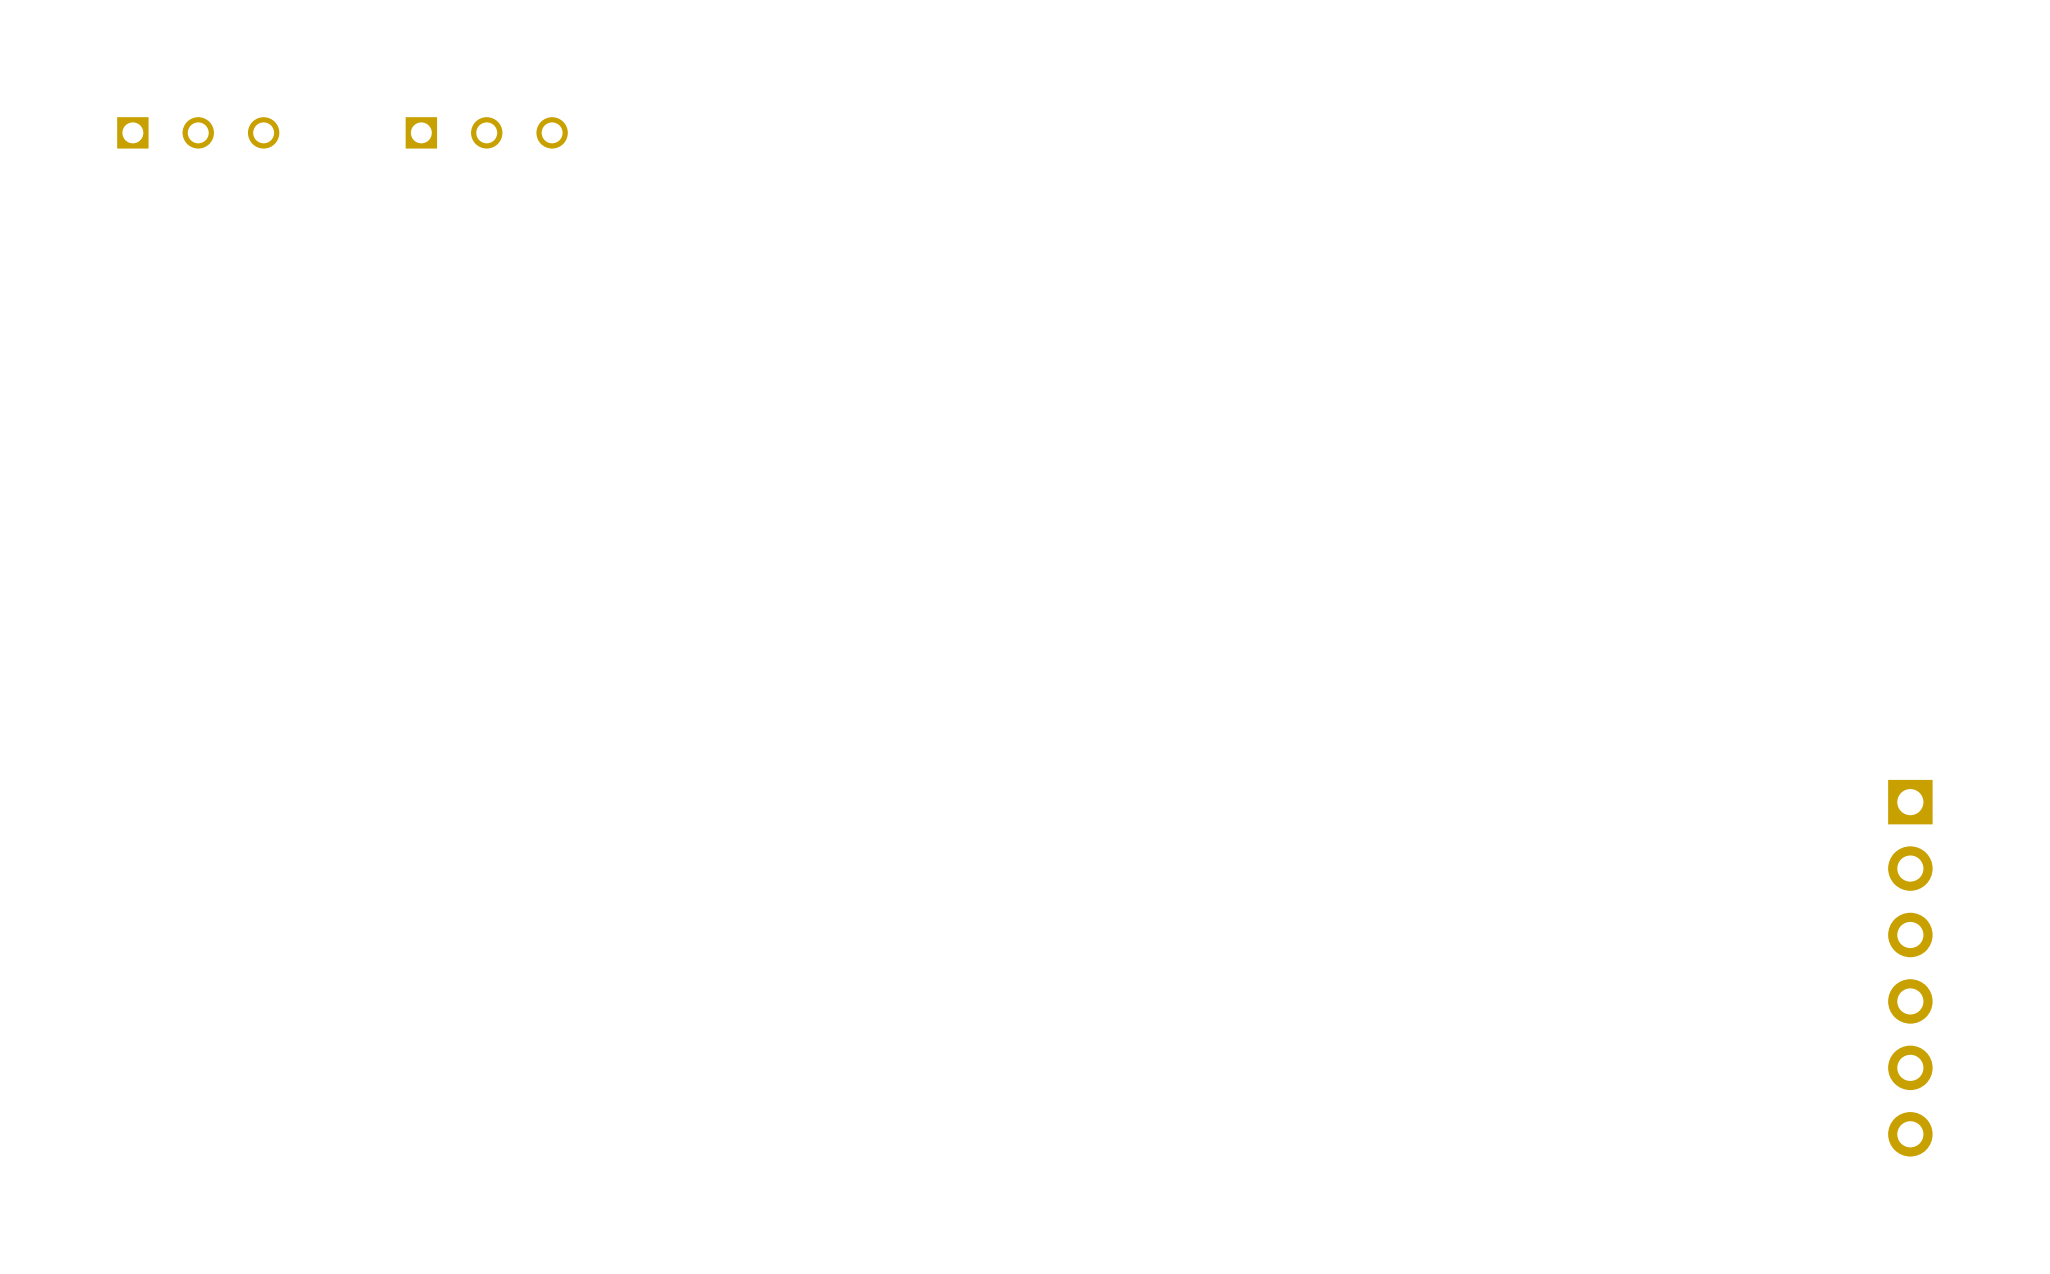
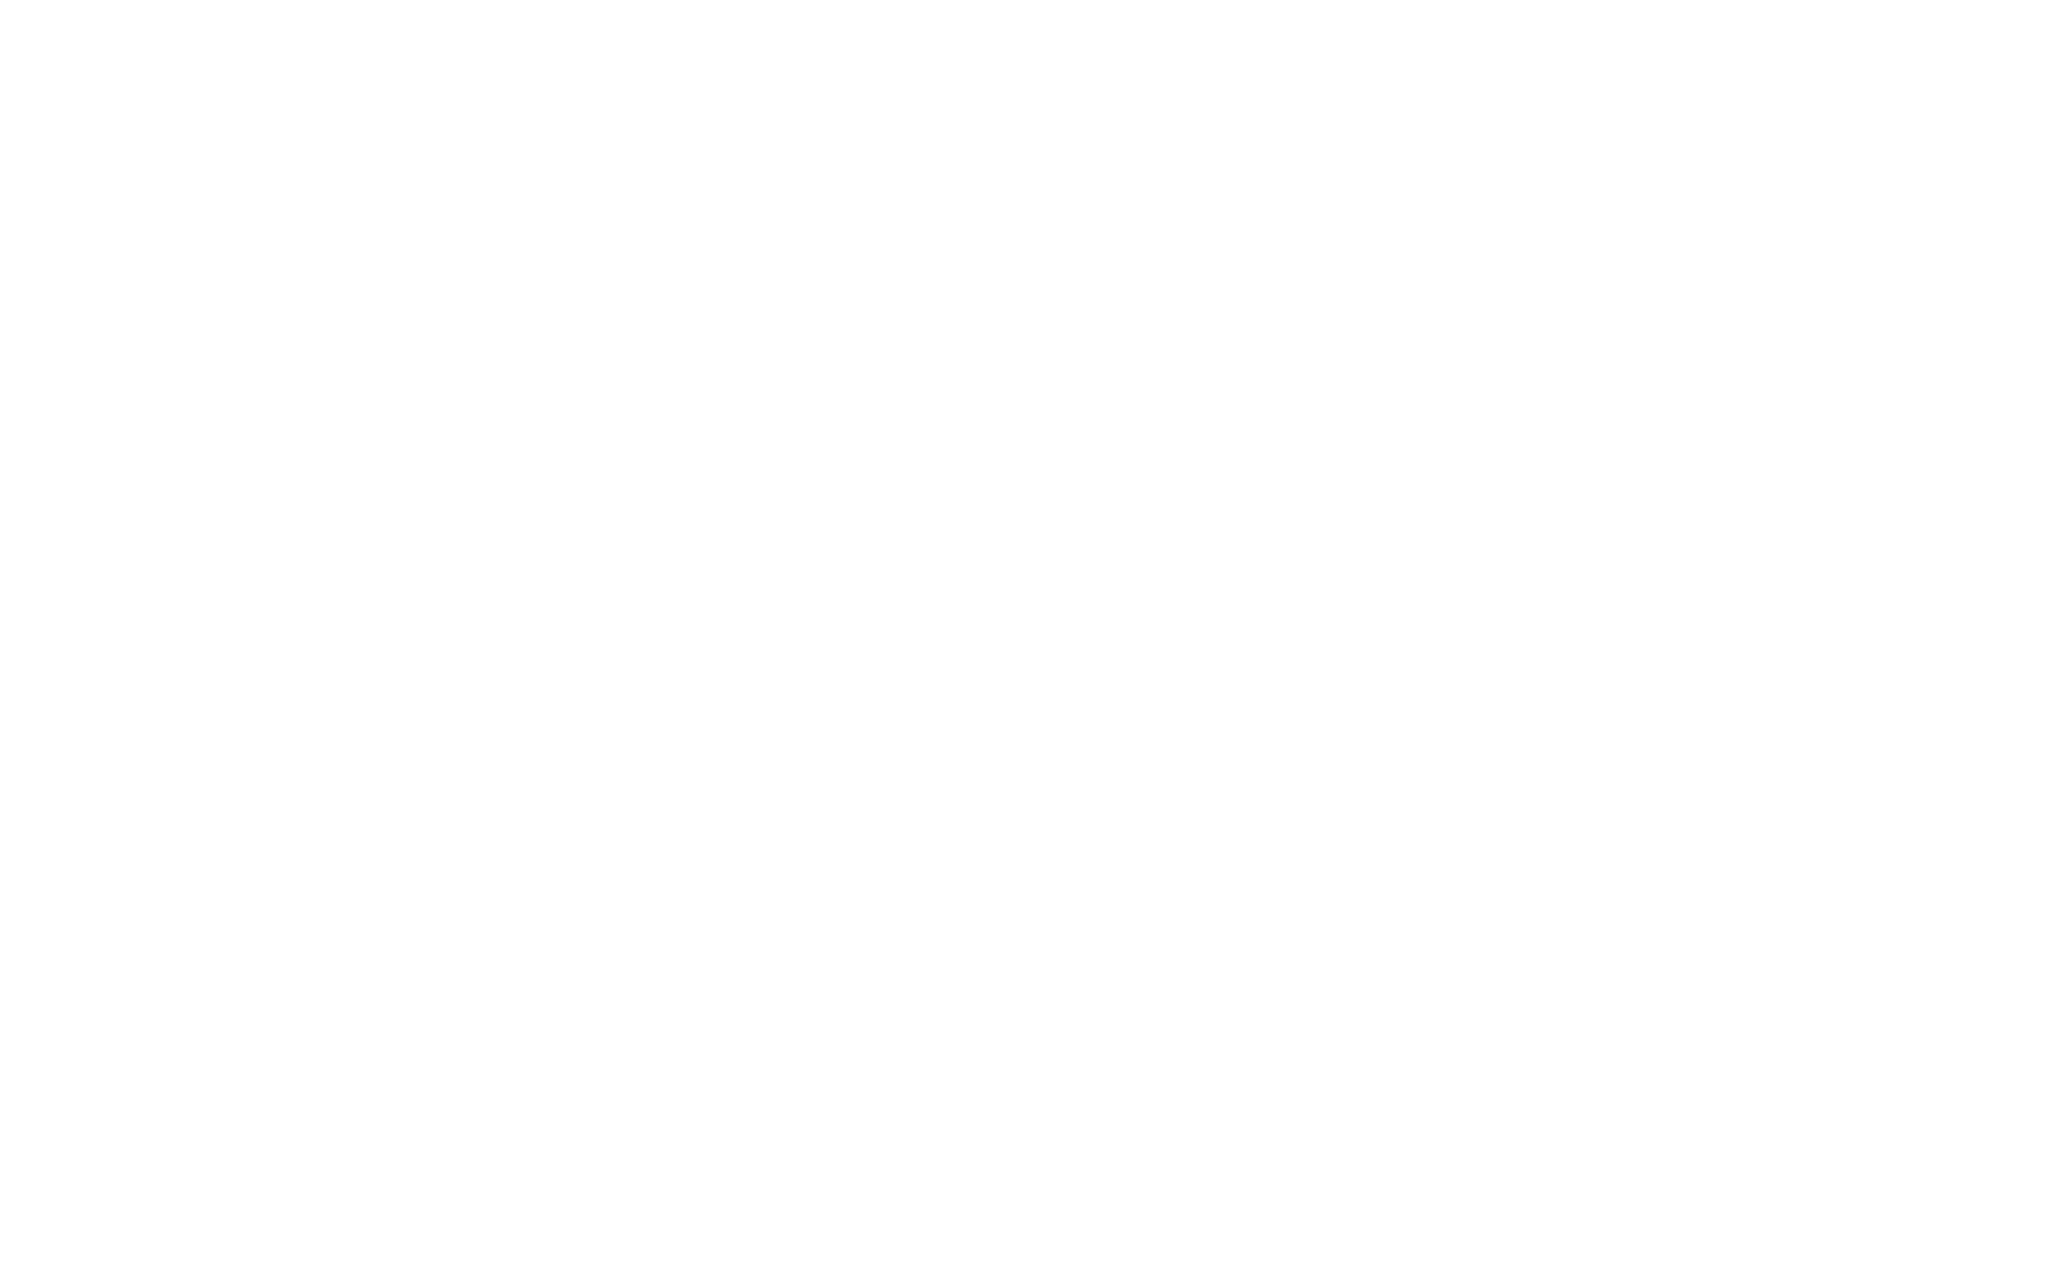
part: (198, 132) -> none
part: (486, 132) -> none
part: (1910, 968) -> none

